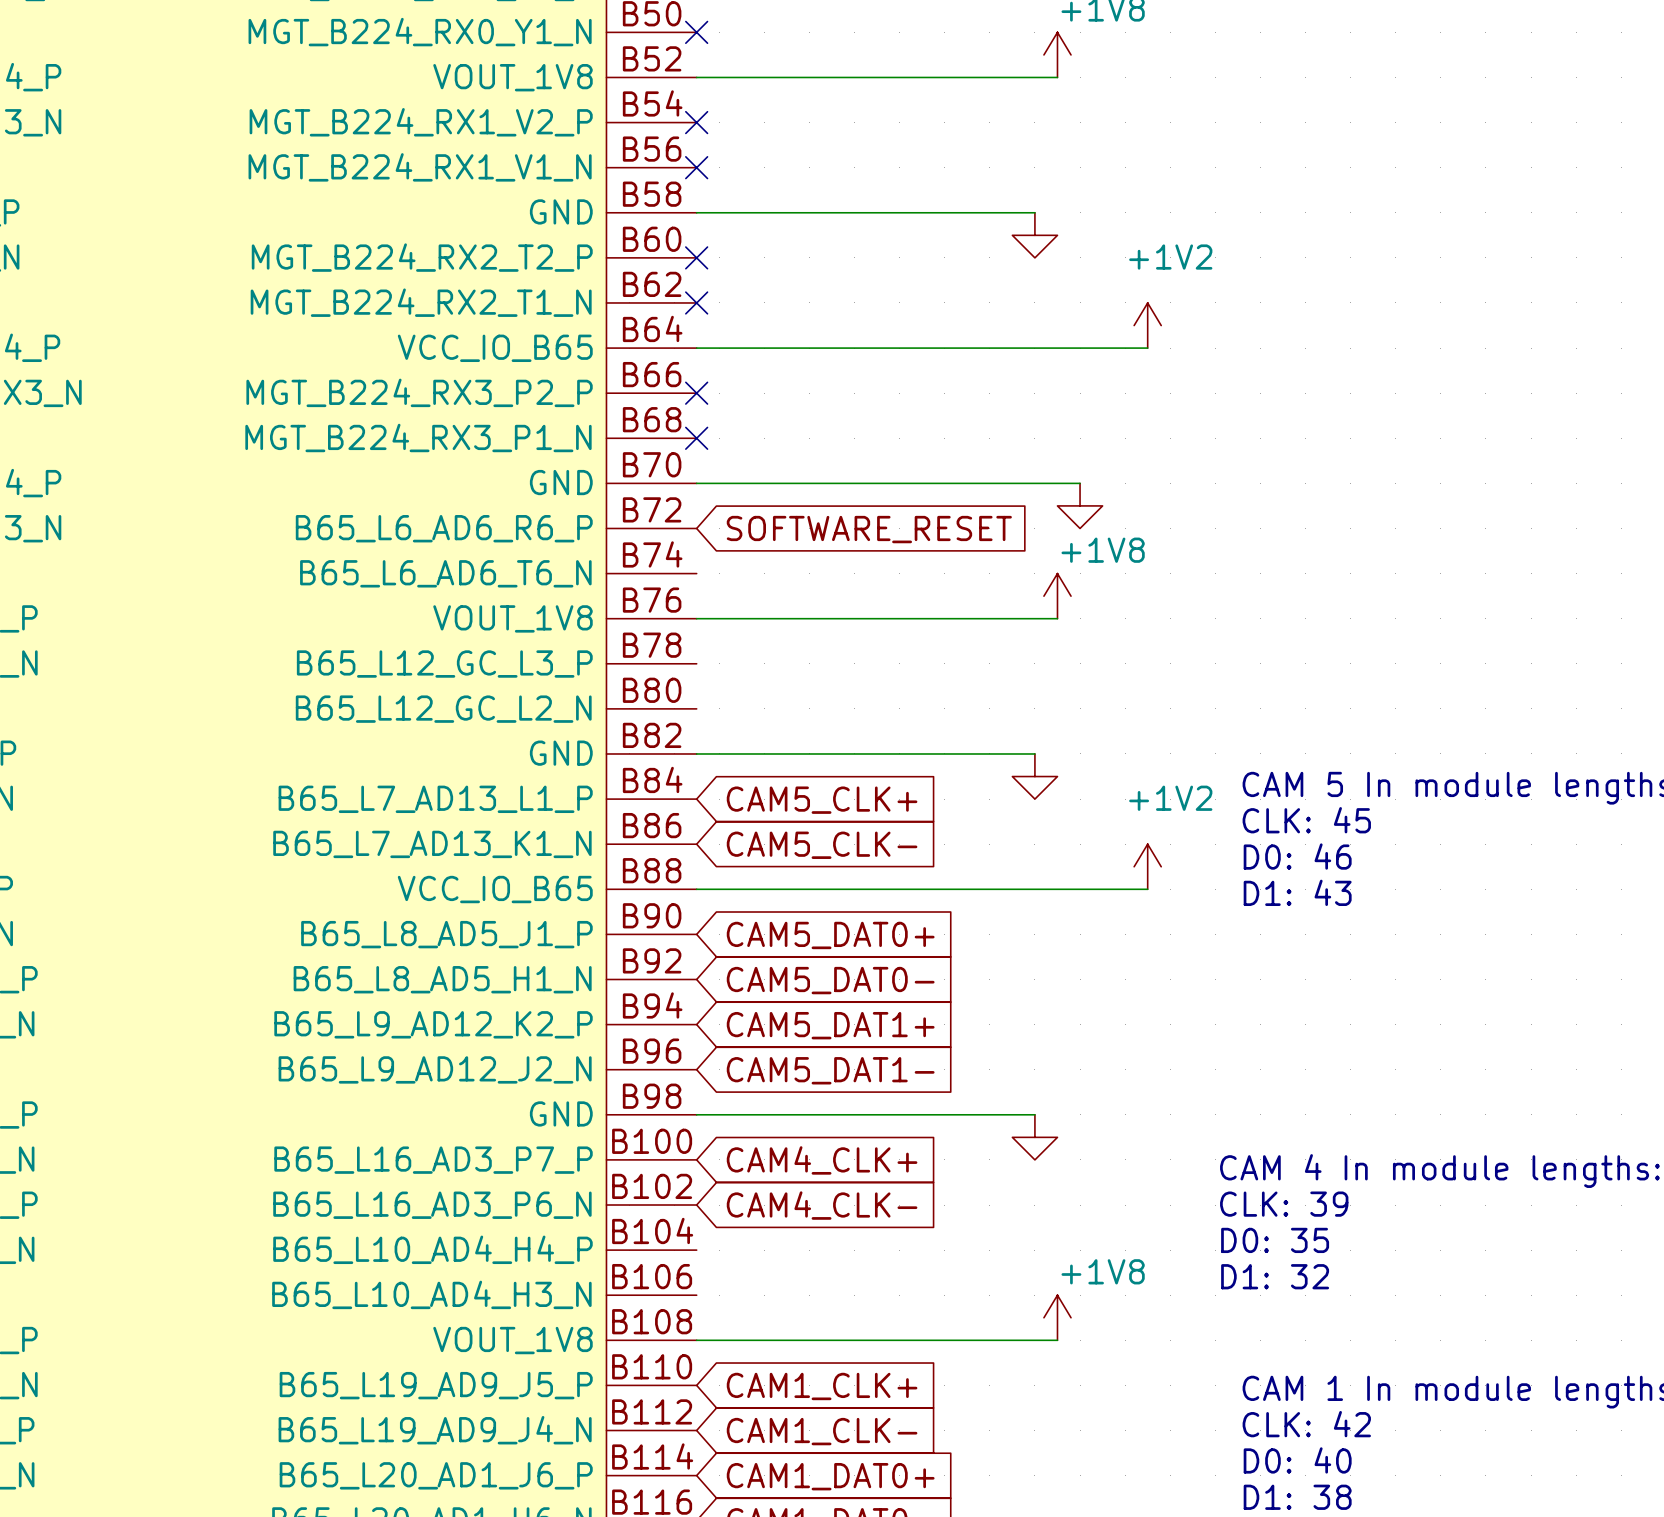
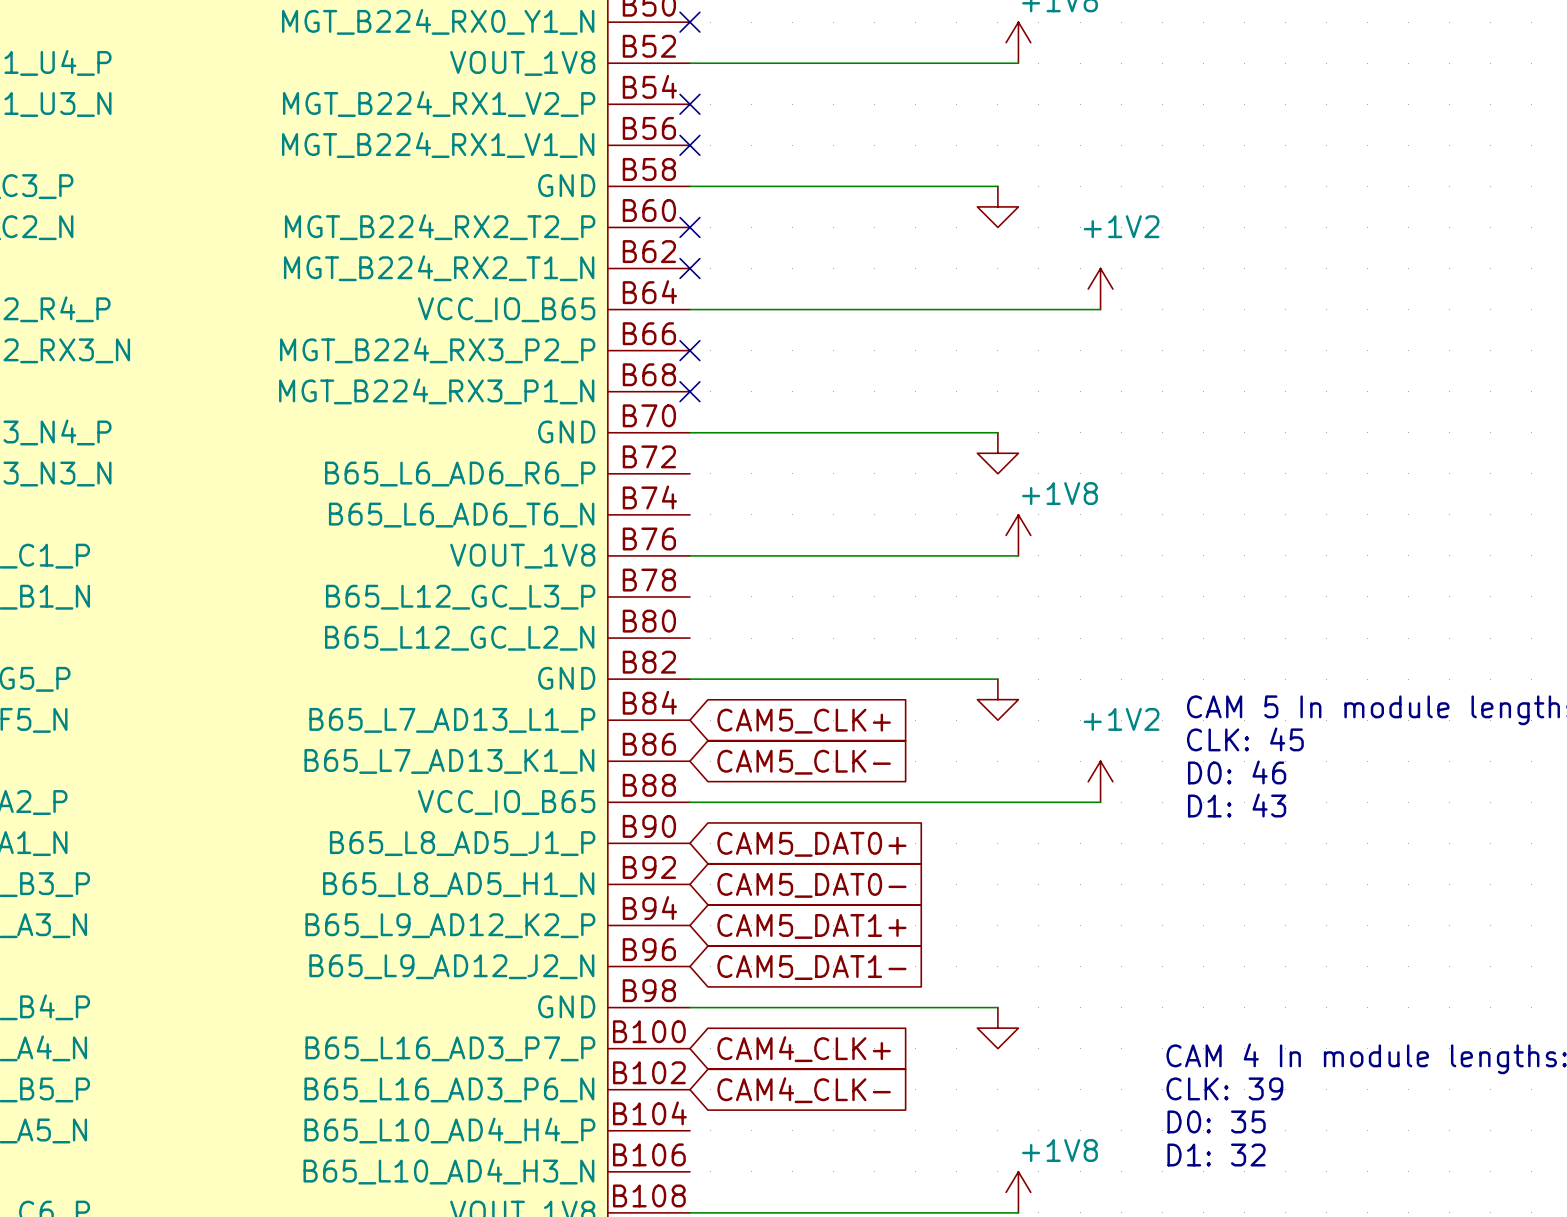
wire: (1034, 483) (1080, 483) -> none
power symbol position: (1080, 505) -> (997, 453)
global label: SOFTWARE_RESET (869, 529) -> none

